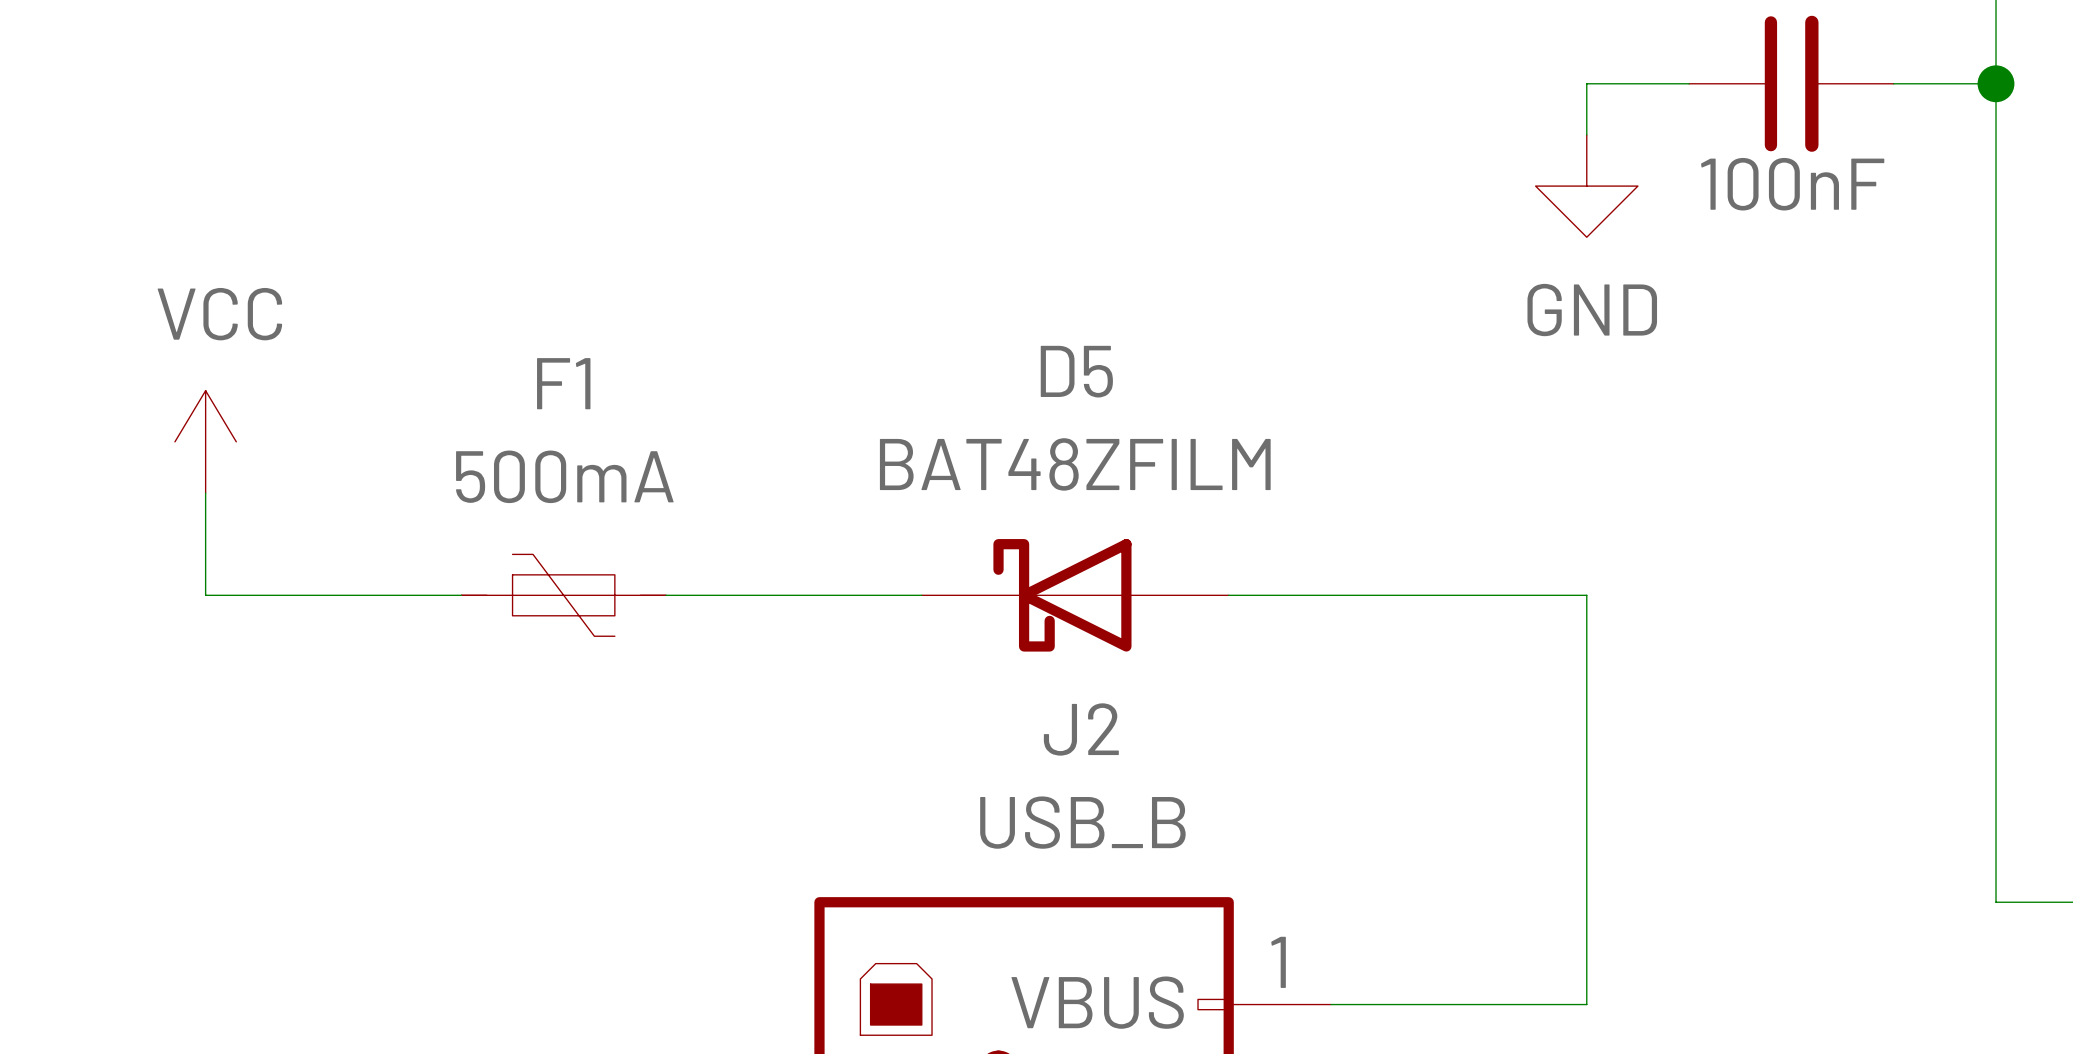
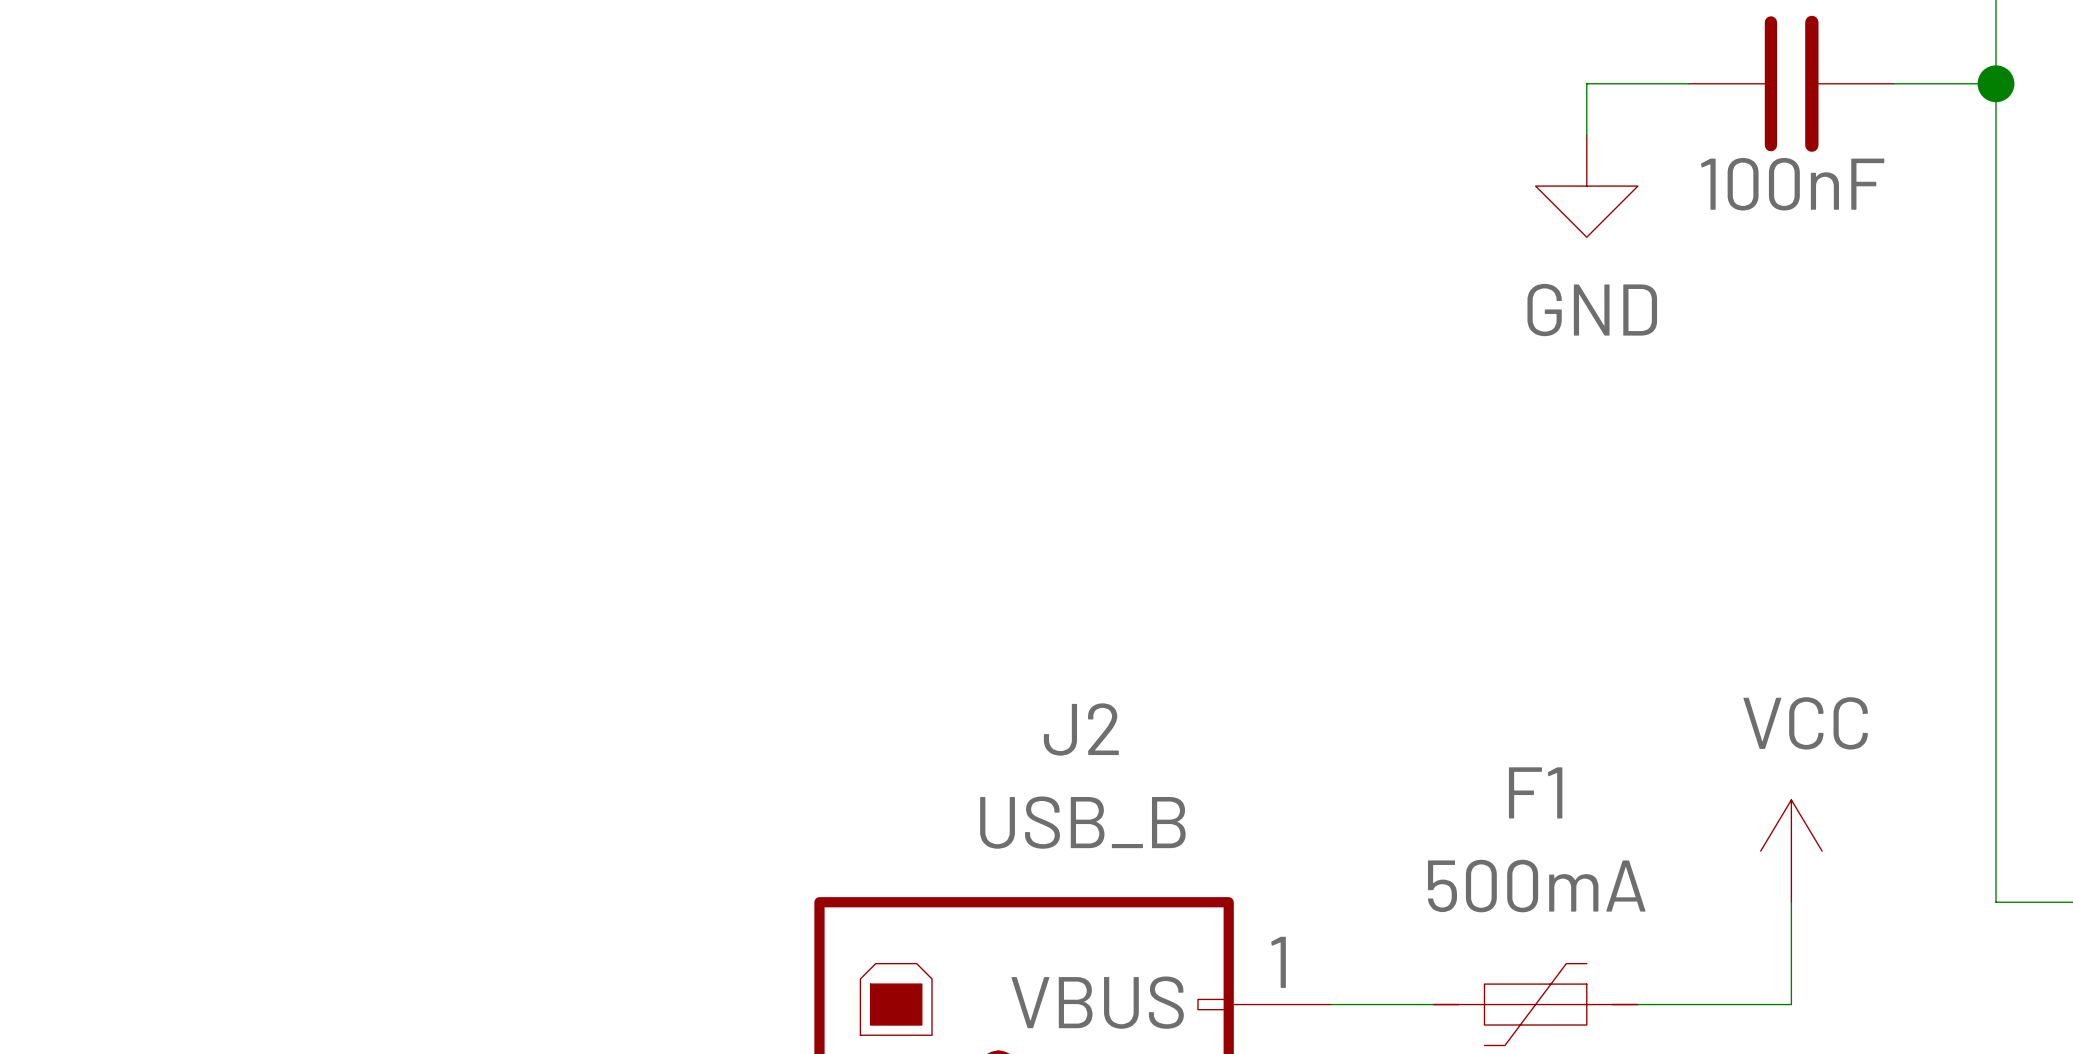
power symbol: VCC (205, 441) -> none
wire: (205, 493) (205, 595) (461, 595) -> none
F1 flip: as is (563, 595) -> left-right (1535, 1004)
F1 position: (563, 595) -> (1535, 1004)
wire: (666, 595) (921, 595) -> none
D5: BAT48ZFILM (1075, 595) -> none
wire: (1228, 595) (1586, 595) (1586, 1004) (1433, 1004) -> none
power symbol: none -> VCC (1791, 851)
wire: none -> (1791, 902) (1791, 1004) (1637, 1004)

